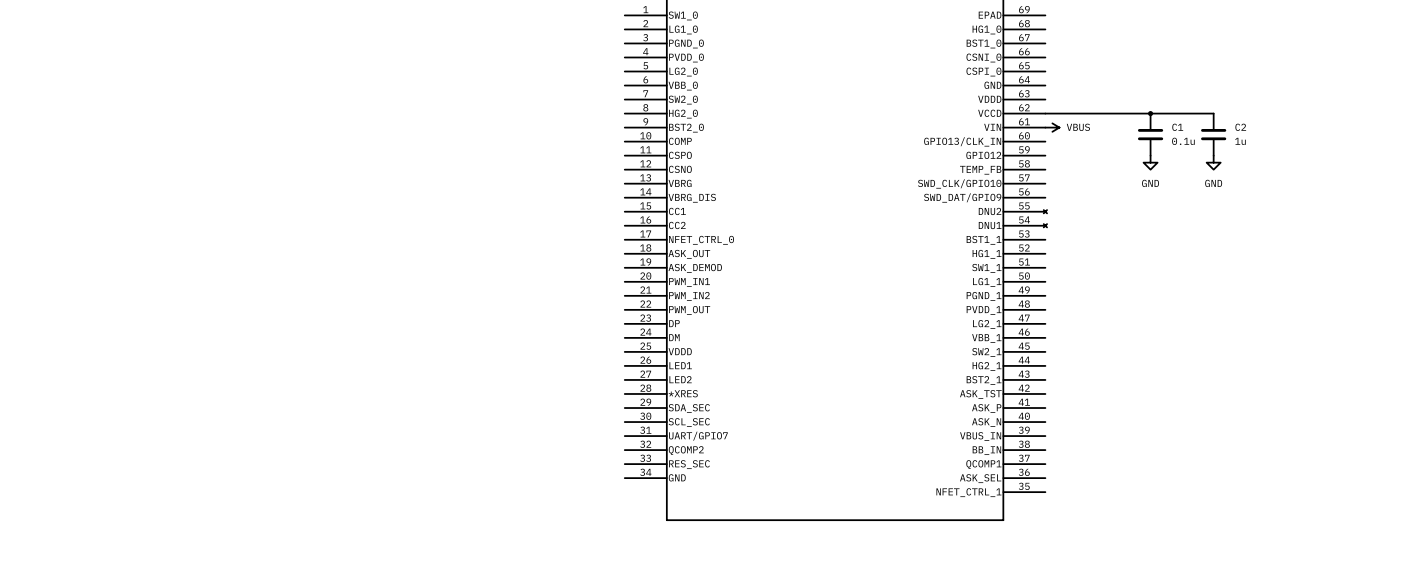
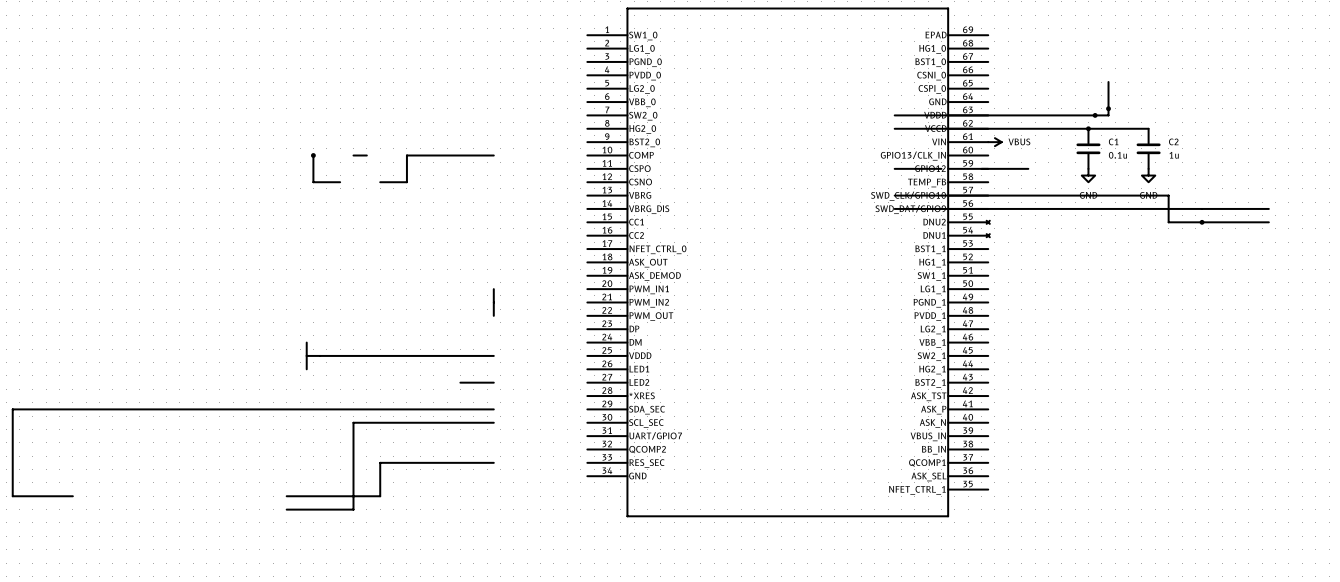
wire: none -> (1108, 82) (1108, 115) (894, 115)
junction: none -> (1108, 108)
junction: none -> (1095, 115)
wire: none -> (894, 128) (988, 128)
wire: none -> (313, 155) (313, 182) (340, 182)
junction: none -> (313, 155)
wire: none -> (353, 155) (366, 155)
wire: none -> (493, 155) (406, 155) (406, 182) (380, 182)
wire: none -> (894, 168) (941, 168)
wire: none -> (981, 168) (1028, 168)
wire: none -> (894, 195) (1168, 195) (1168, 222) (1268, 222)
wire: none -> (894, 208) (1268, 208)
junction: none -> (1202, 222)
wire: none -> (493, 289) (493, 315)
wire: none -> (306, 342) (306, 369)
wire: none -> (306, 355) (493, 355)
wire: none -> (460, 382) (493, 382)
wire: none -> (493, 409) (12, 409) (12, 496) (72, 496)
wire: none -> (493, 422) (353, 422) (353, 509) (286, 509)
wire: none -> (493, 462) (380, 462) (380, 496) (286, 496)

